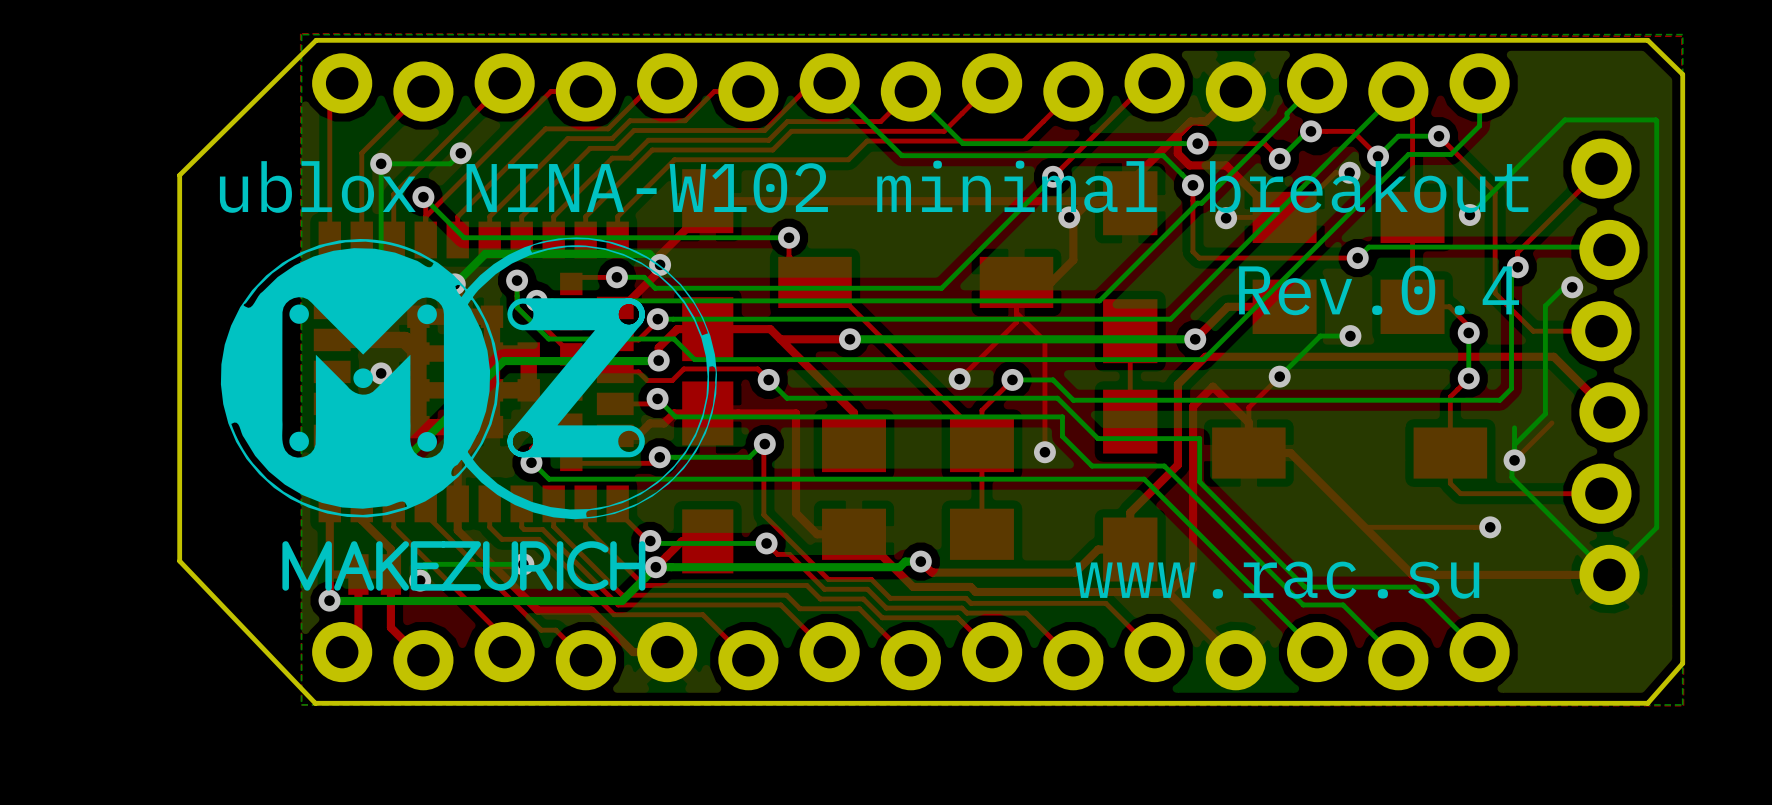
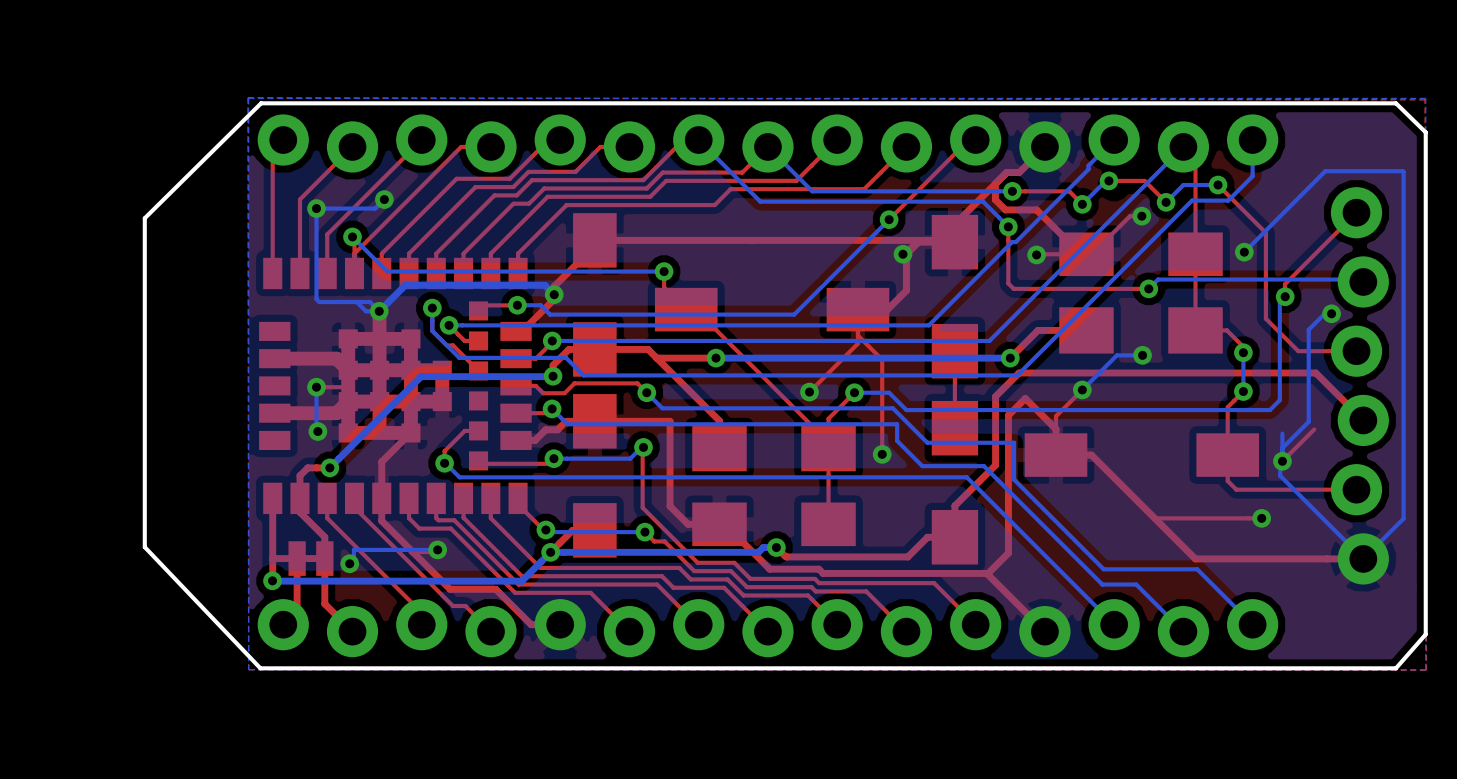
text: ublox NINA-W102 minimal breakout (874, 186) -> none
drawing: [220, 237, 718, 591] -> none
text: Rev.0.4 (1379, 290) -> none
text: www.rac.su (1277, 580) -> none

